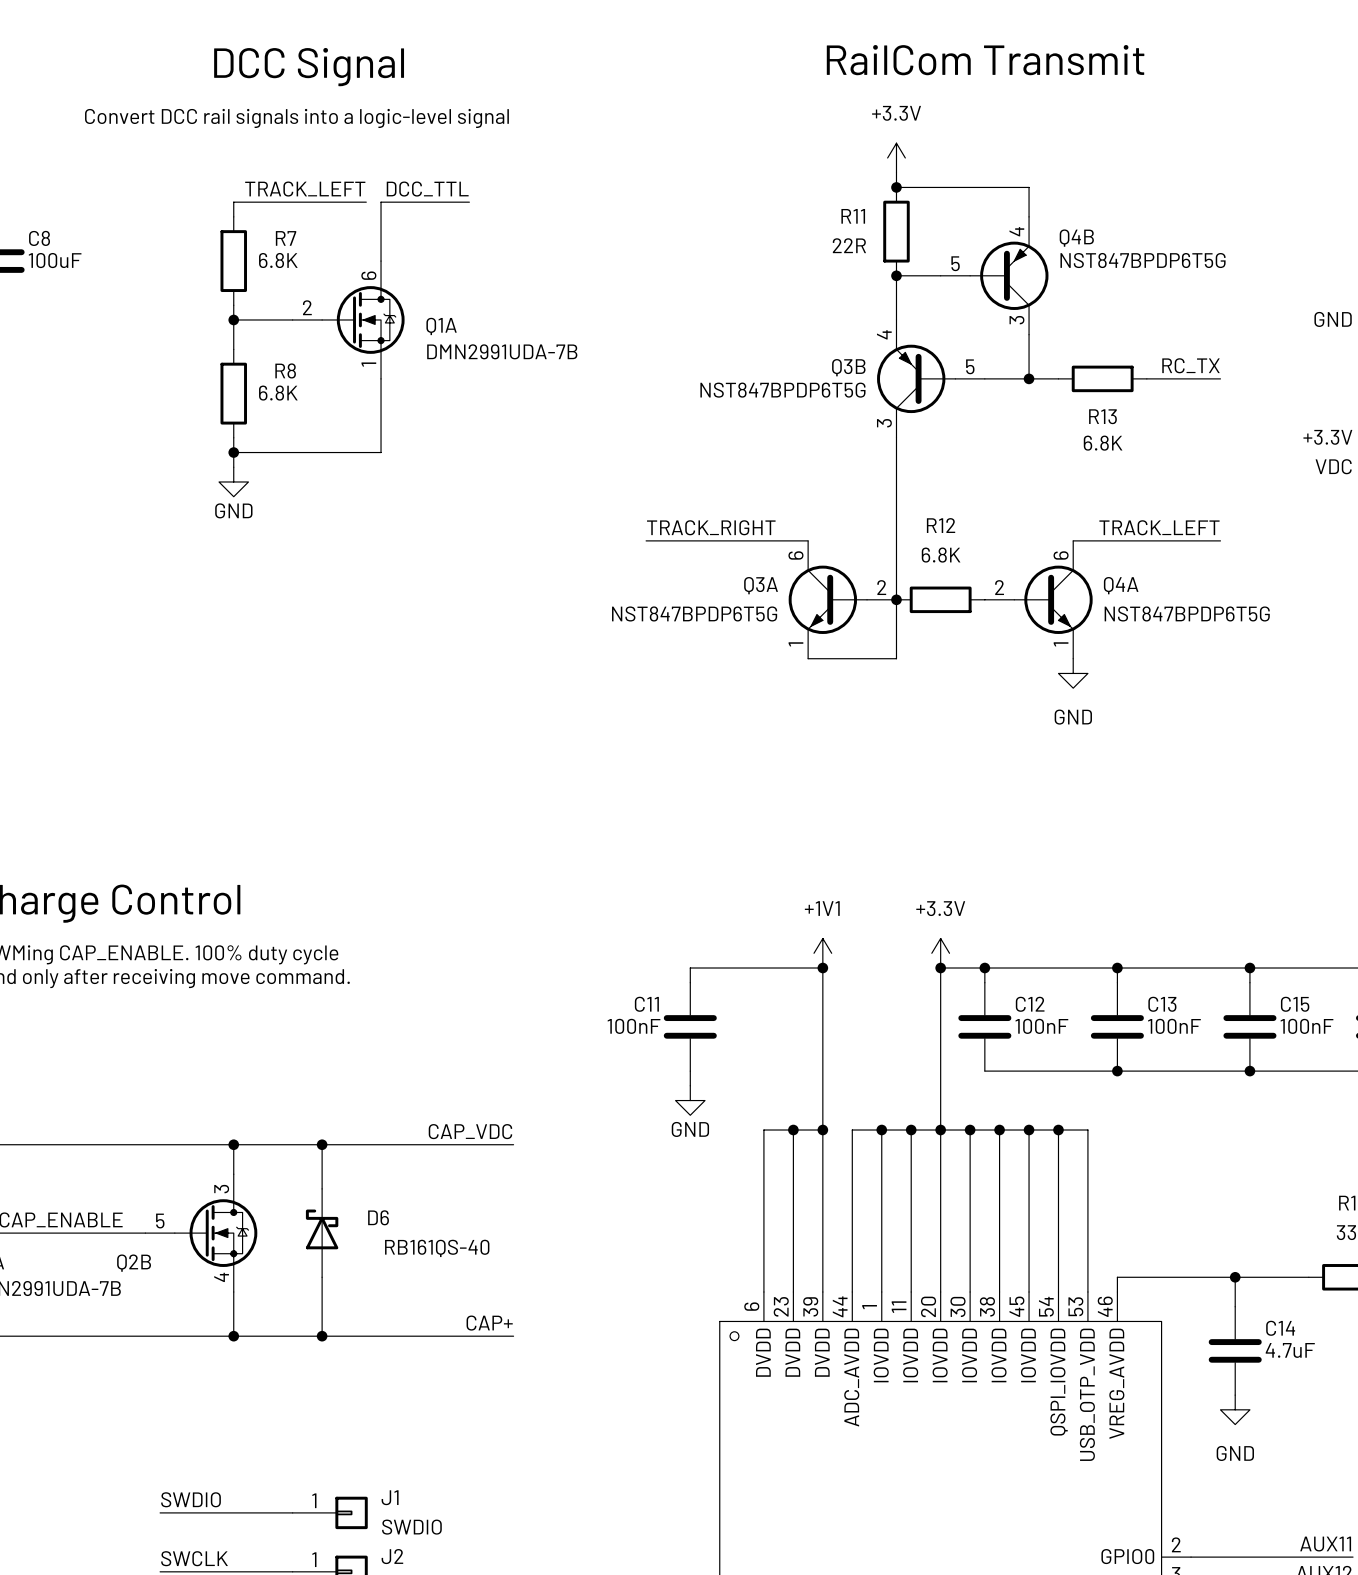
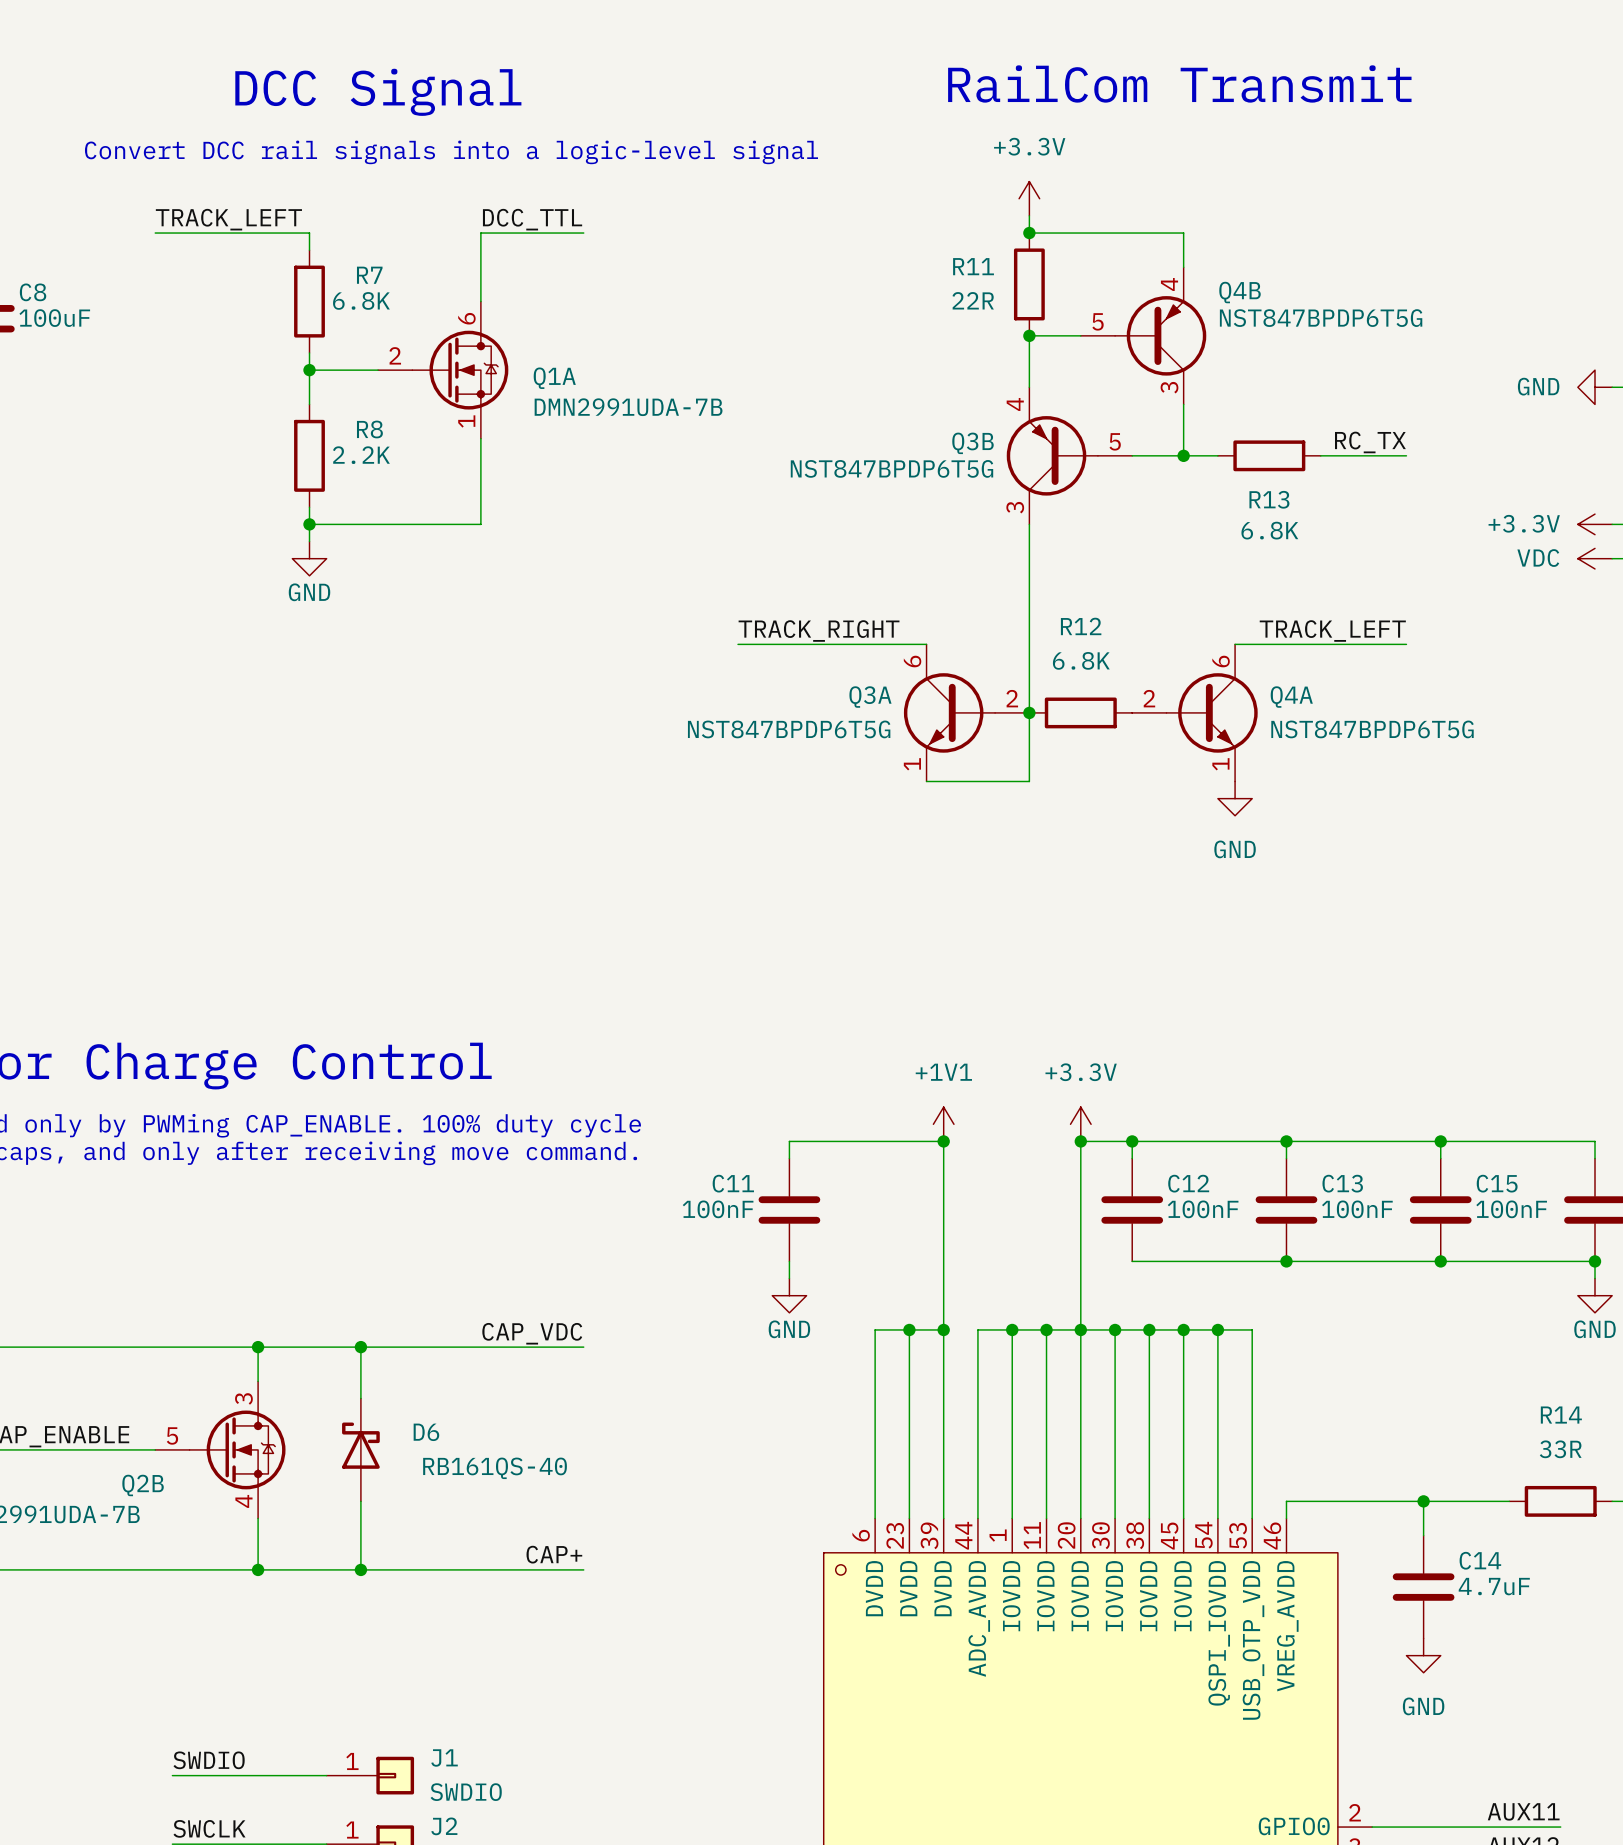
wire: none -> (155, 233) (309, 233) (309, 250)
label position: TRACK_LEFT (305, 189) -> TRACK_LEFT (228, 219)
label position: DCC_TTL (427, 189) -> DCC_TTL (532, 219)
wire: (366, 202) (233, 202) (233, 216) -> none
wire: (469, 202) (381, 202) (381, 261) -> (583, 233) (480, 233) (480, 301)
R7 position: (233, 261) -> (309, 301)
wire: (233, 305) (233, 349) -> (309, 353) (309, 404)
wire: (233, 319) (292, 319) -> (309, 370) (378, 370)
junction position: (233, 319) -> (309, 370)
Q1A position: (348, 319) -> (443, 370)
wire: (381, 378) (381, 452) (233, 452) -> (480, 438) (480, 524) (309, 524)
R8 position: (233, 393) -> (309, 455)
R8 value: 6.8K (278, 393) -> 2.2K (361, 455)
wire: (233, 437) (233, 467) -> (309, 507) (309, 541)
junction position: (233, 452) -> (309, 524)
power symbol position: GND (233, 481) -> GND (309, 558)

